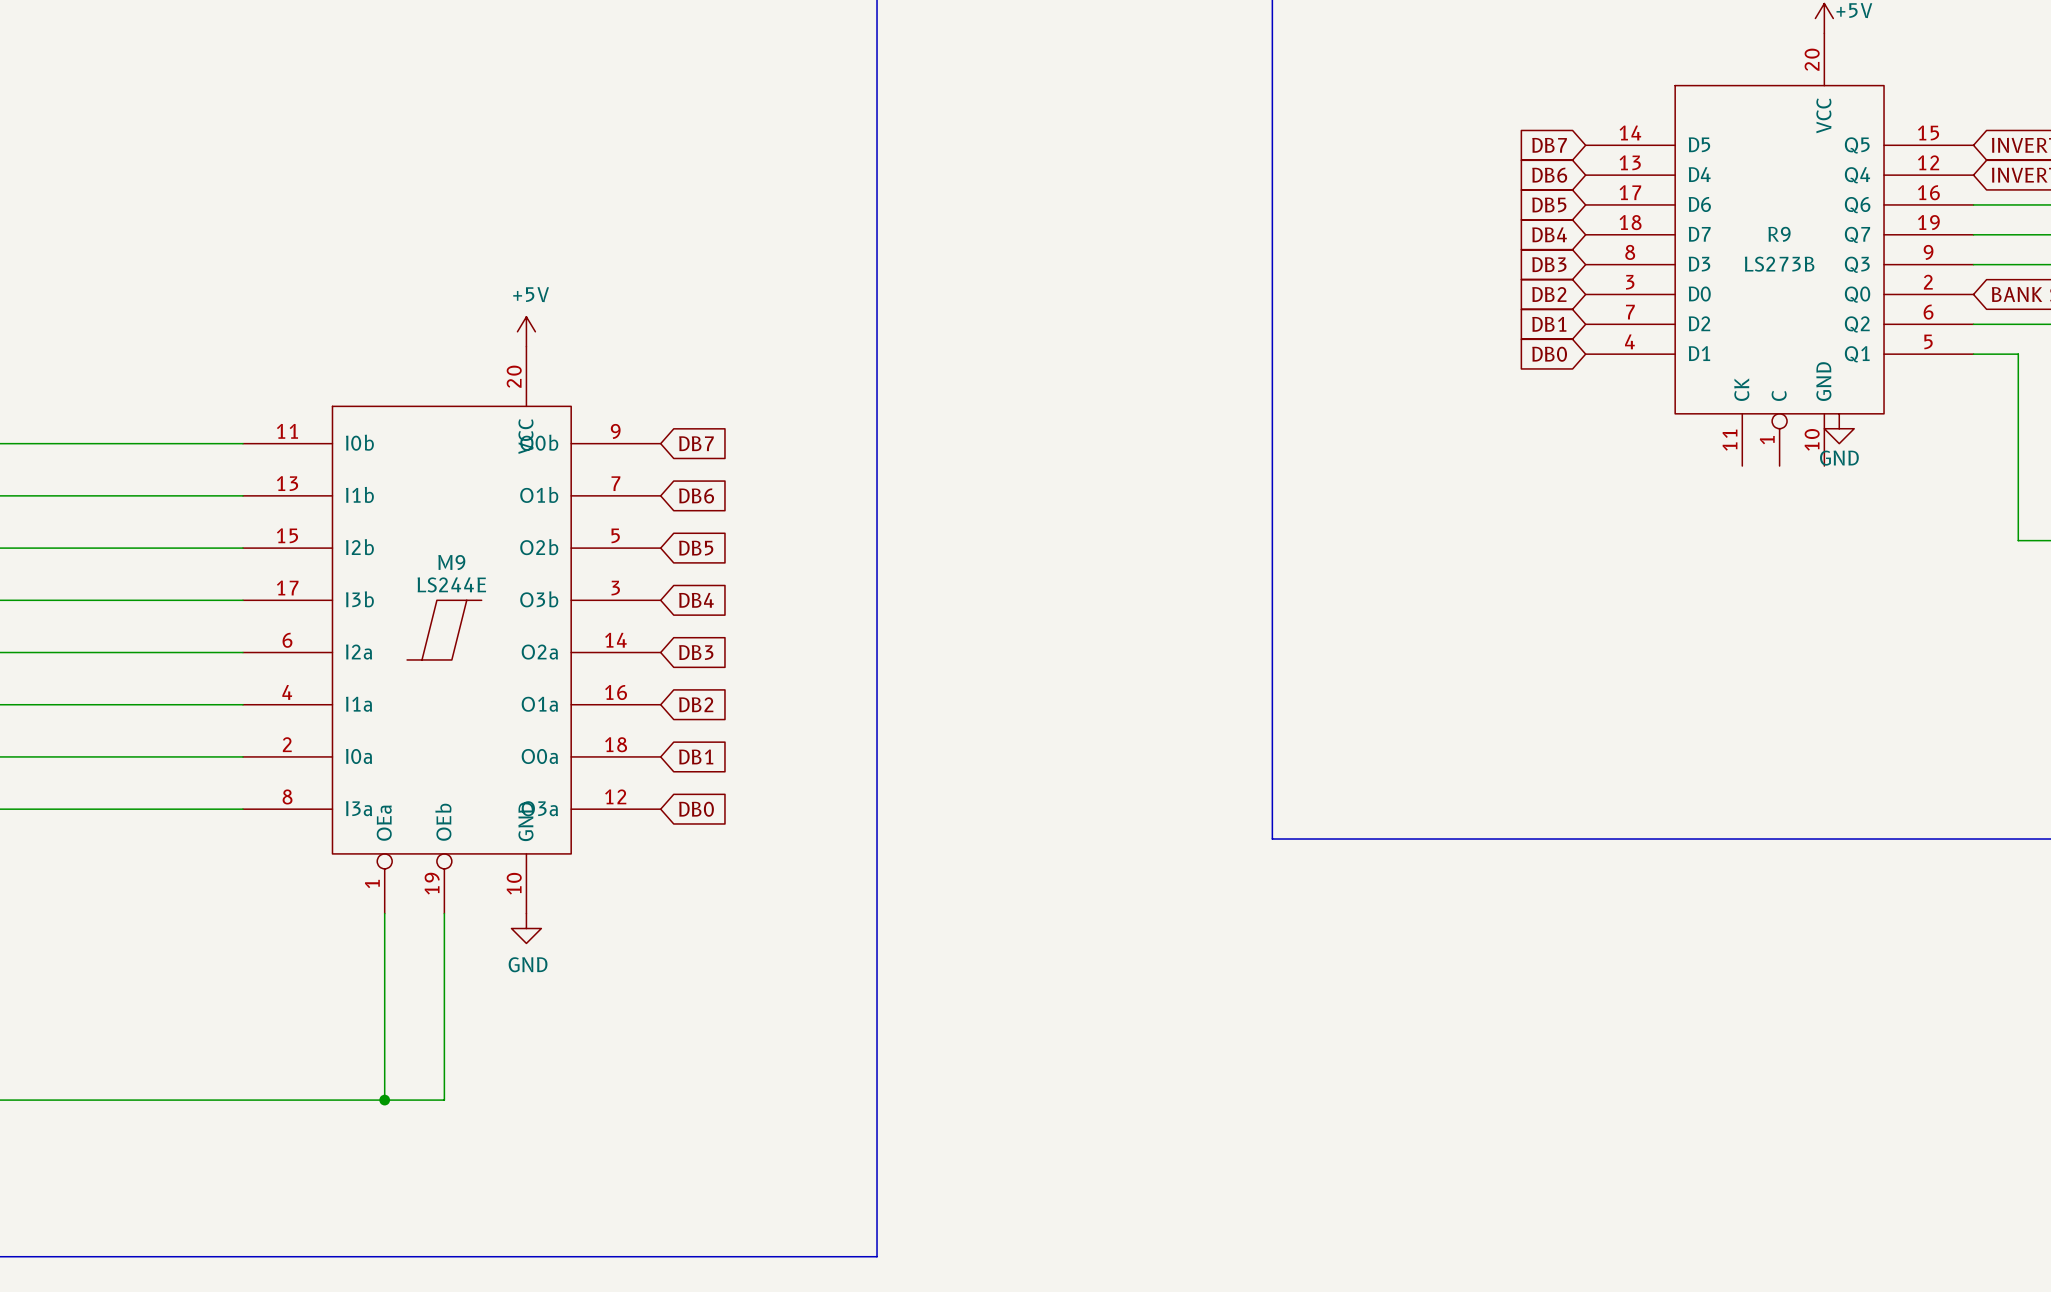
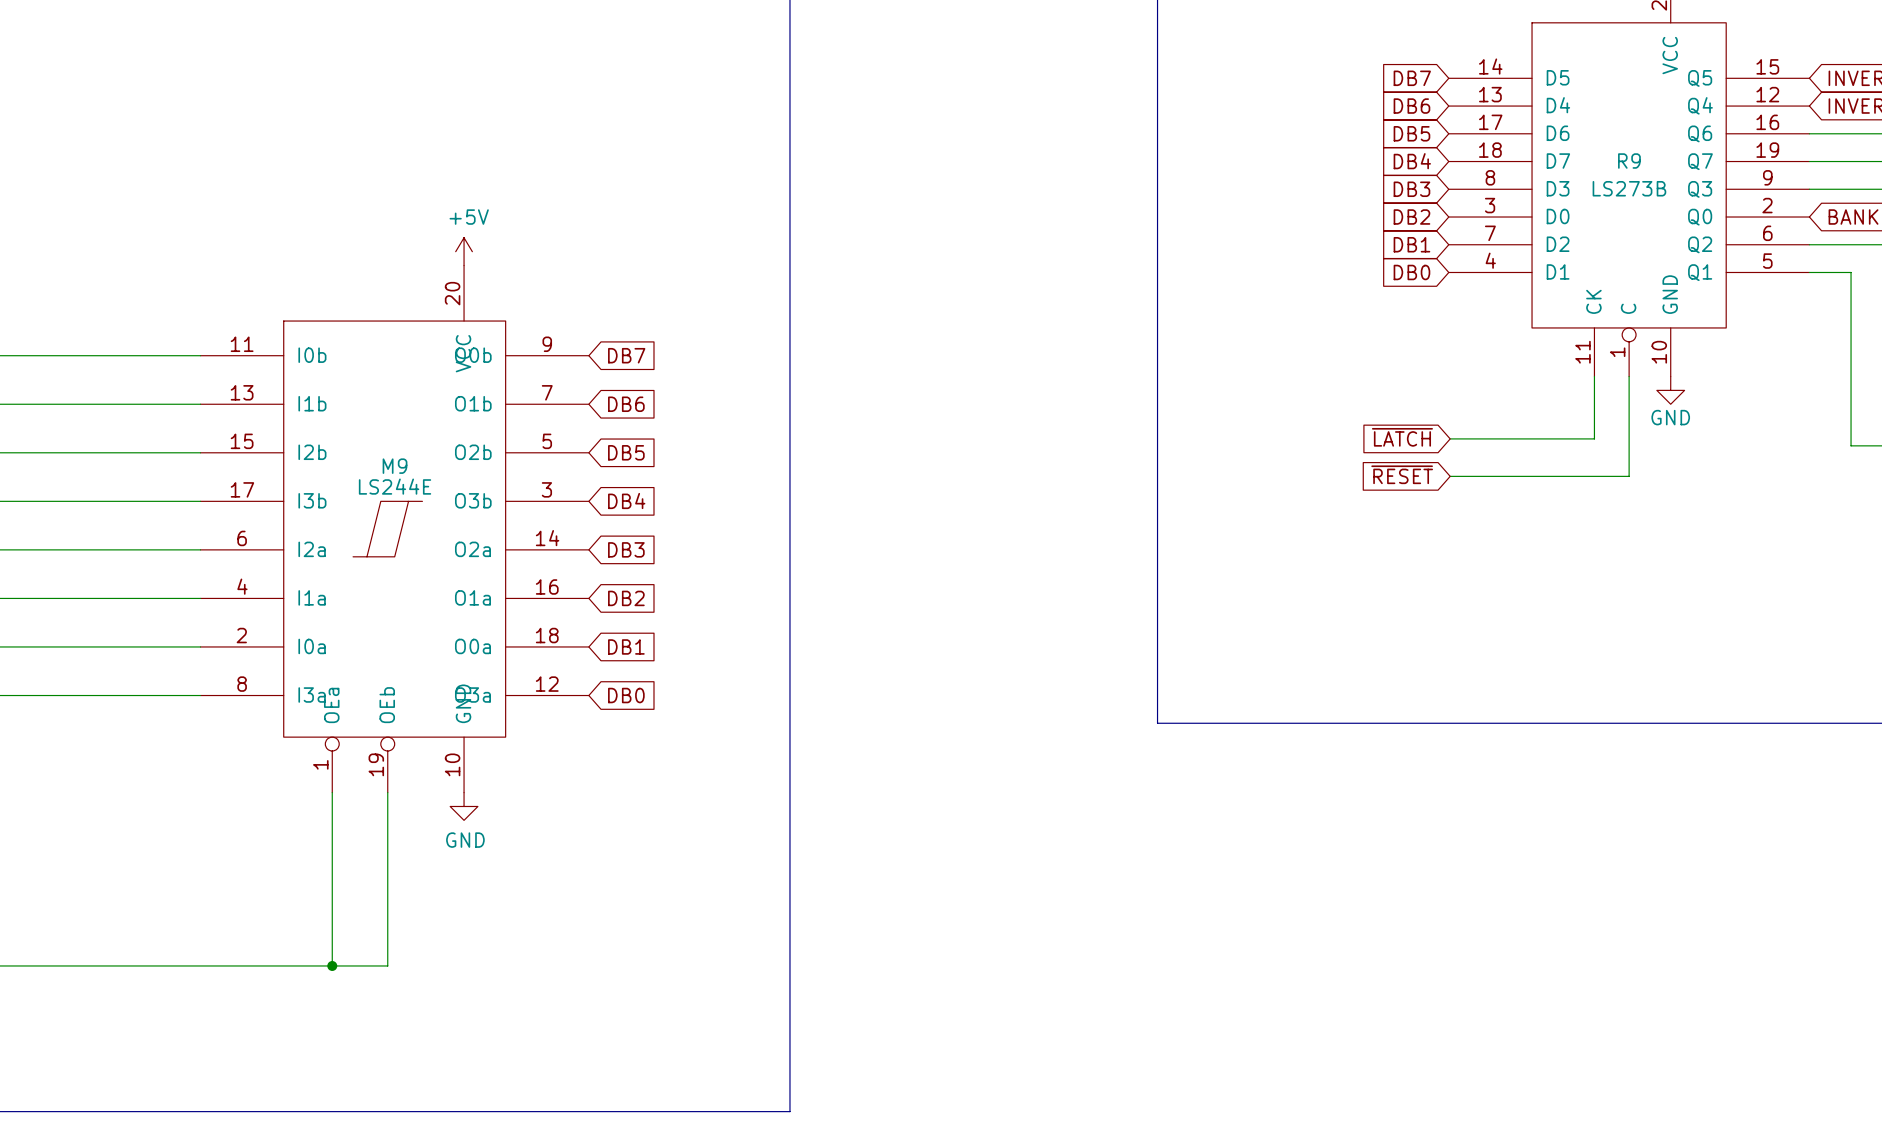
power symbol position: GND (1839, 428) -> GND (1670, 390)
wire: none -> (1594, 376) (1594, 438) (1450, 438)
wire: none -> (1629, 376) (1629, 476) (1450, 476)
global label: none -> ~{LATCH} (1402, 437)
global label: none -> ~{RESET} (1402, 474)

